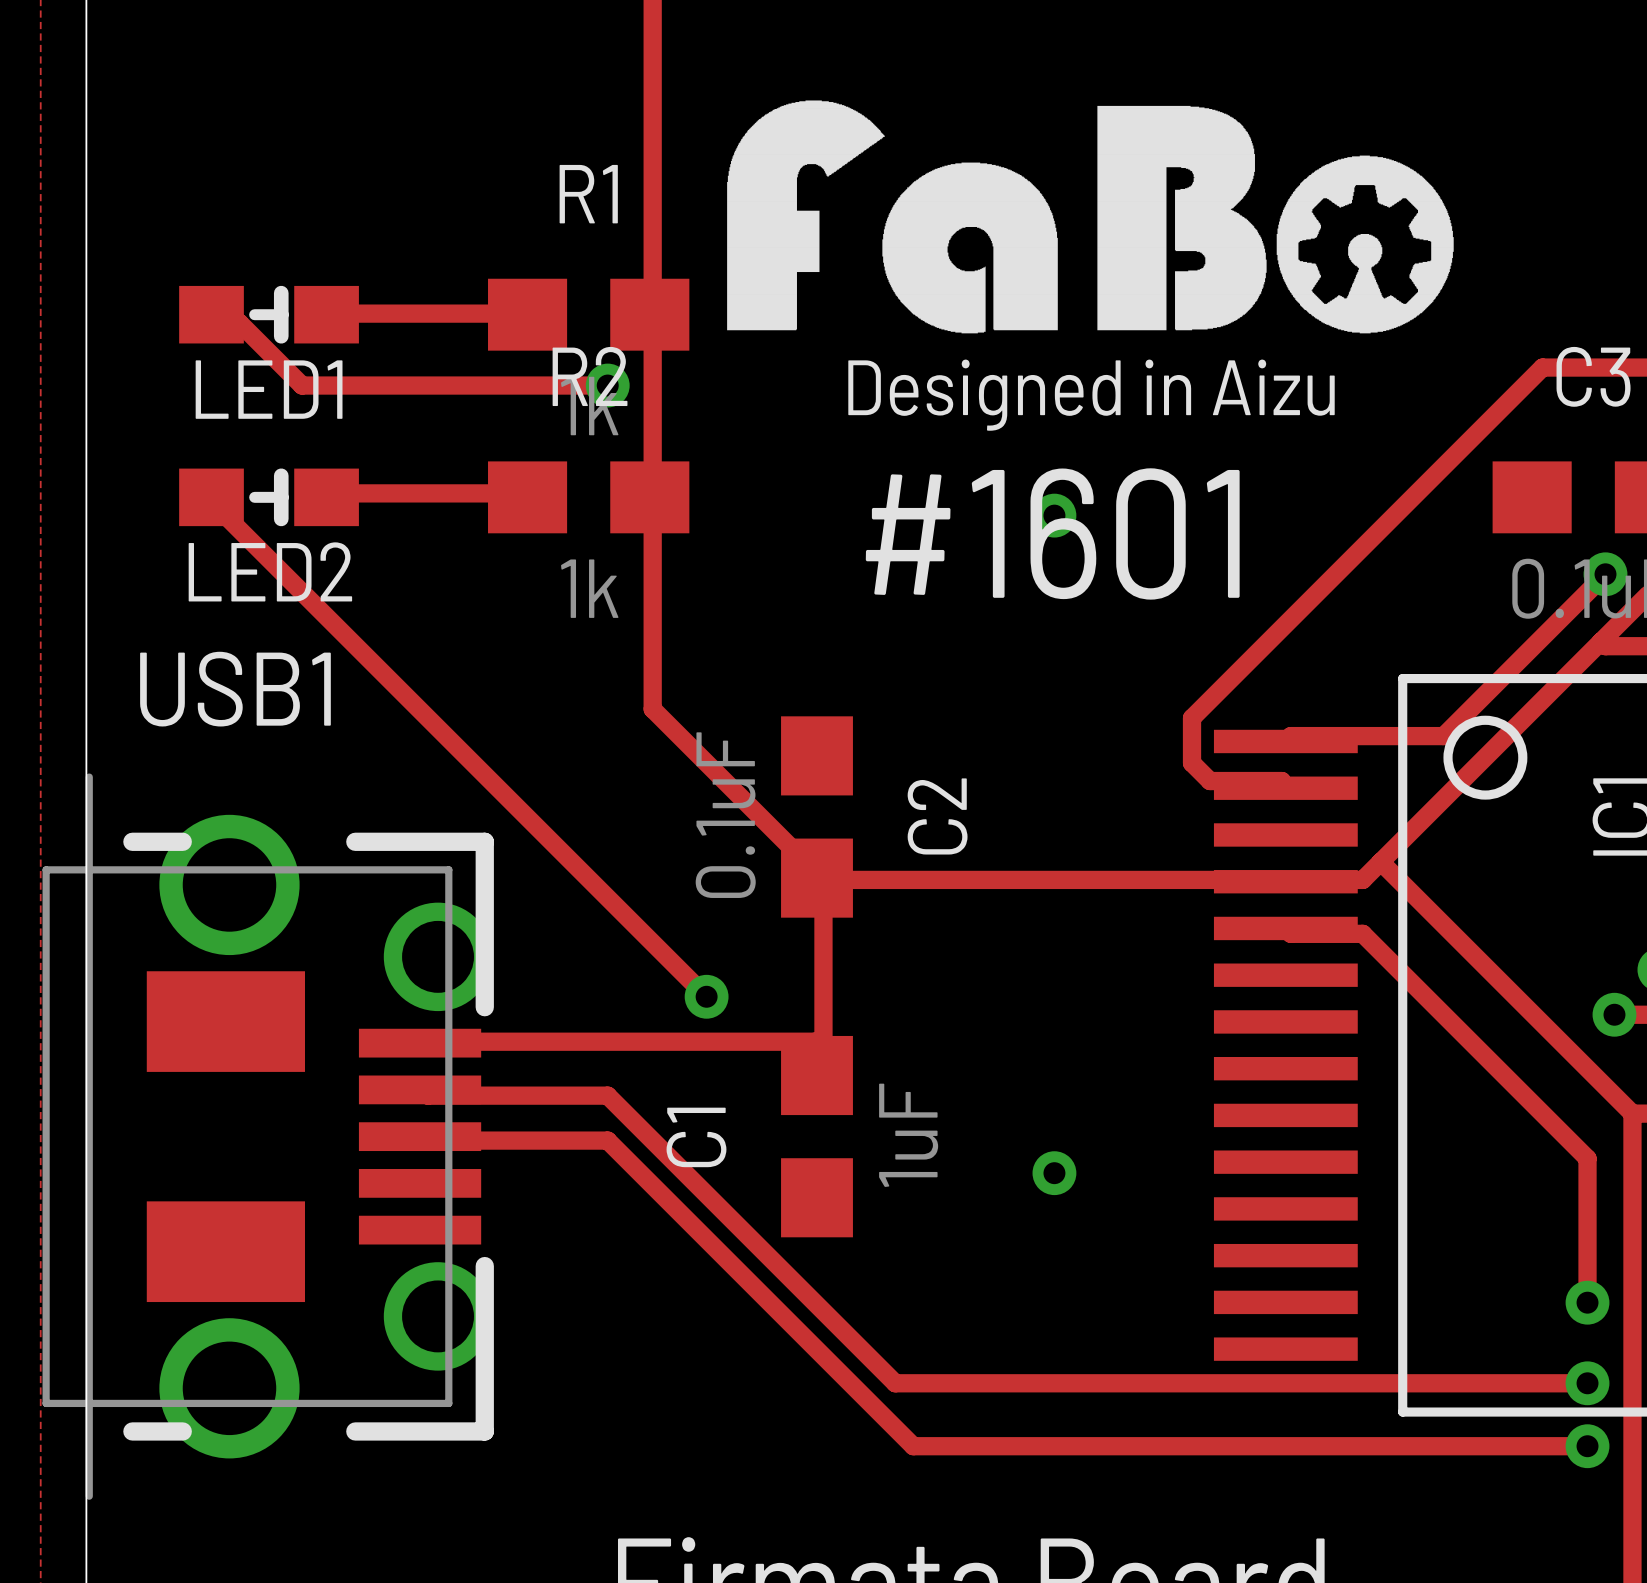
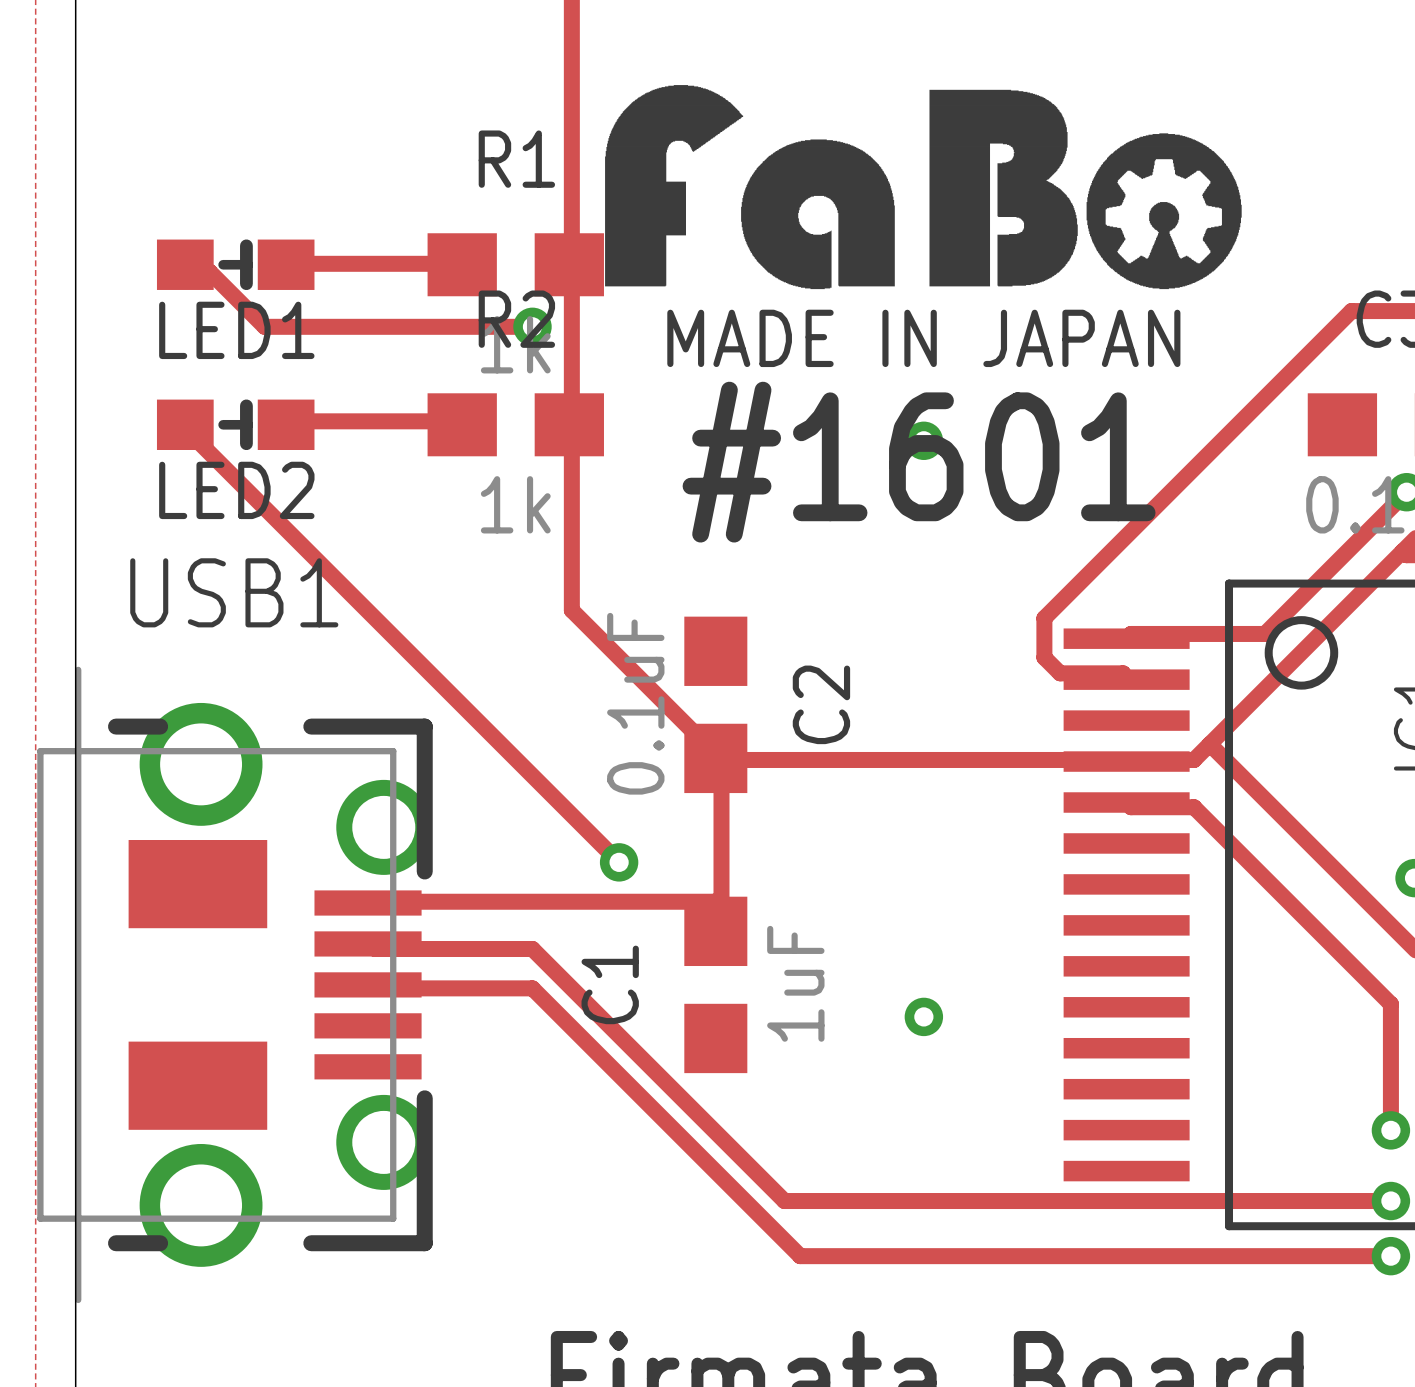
drawing position: (1090, 216) -> (923, 187)
text: Designed in Aizu (1091, 395) -> MADE IN JAPAN (923, 338)

